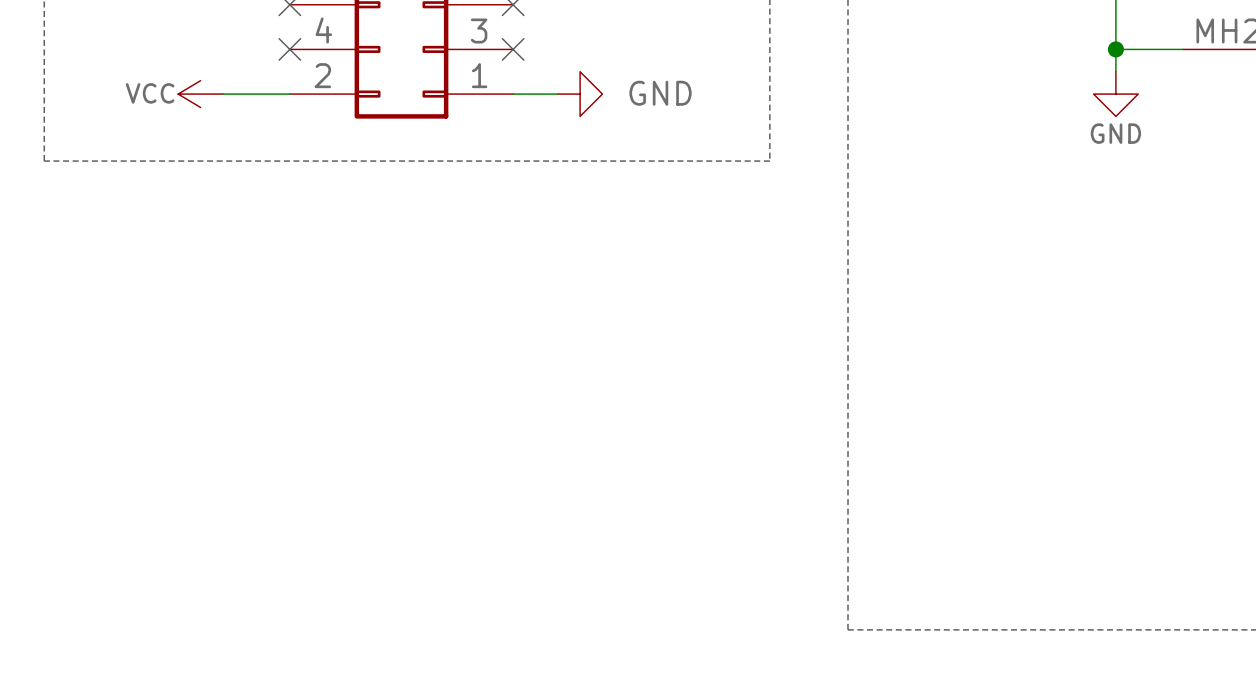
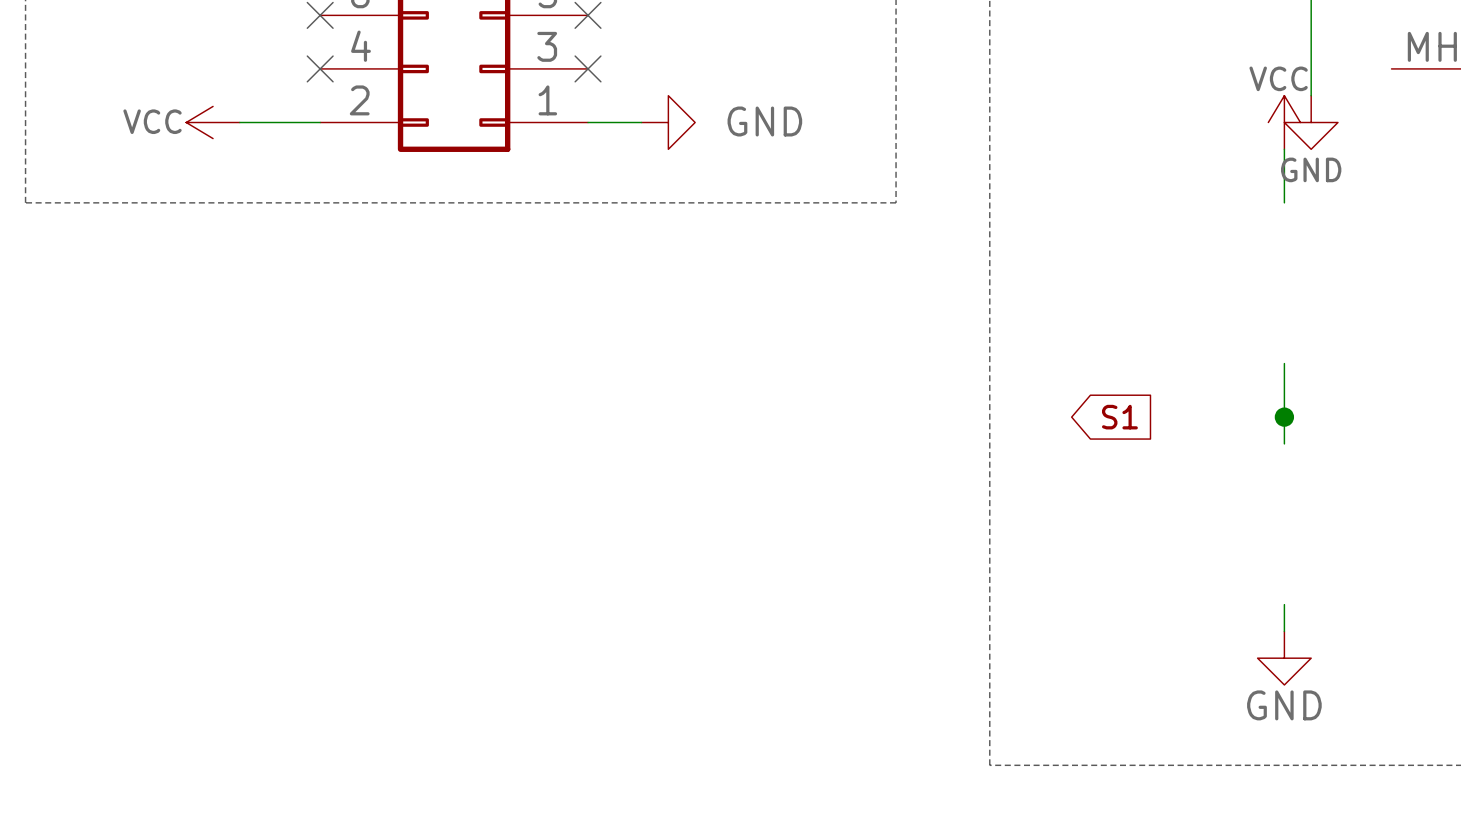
wire: (1115, 49) (1182, 49) -> none
junction: (1115, 49) -> none
power symbol: none -> VCC (1284, 122)
wire: none -> (1284, 149) (1284, 202)
wire: none -> (1284, 363) (1284, 443)
global label: none -> S1 (1119, 417)
junction: none -> (1284, 417)
wire: none -> (1284, 604) (1284, 631)
power symbol: none -> GND (1284, 658)

